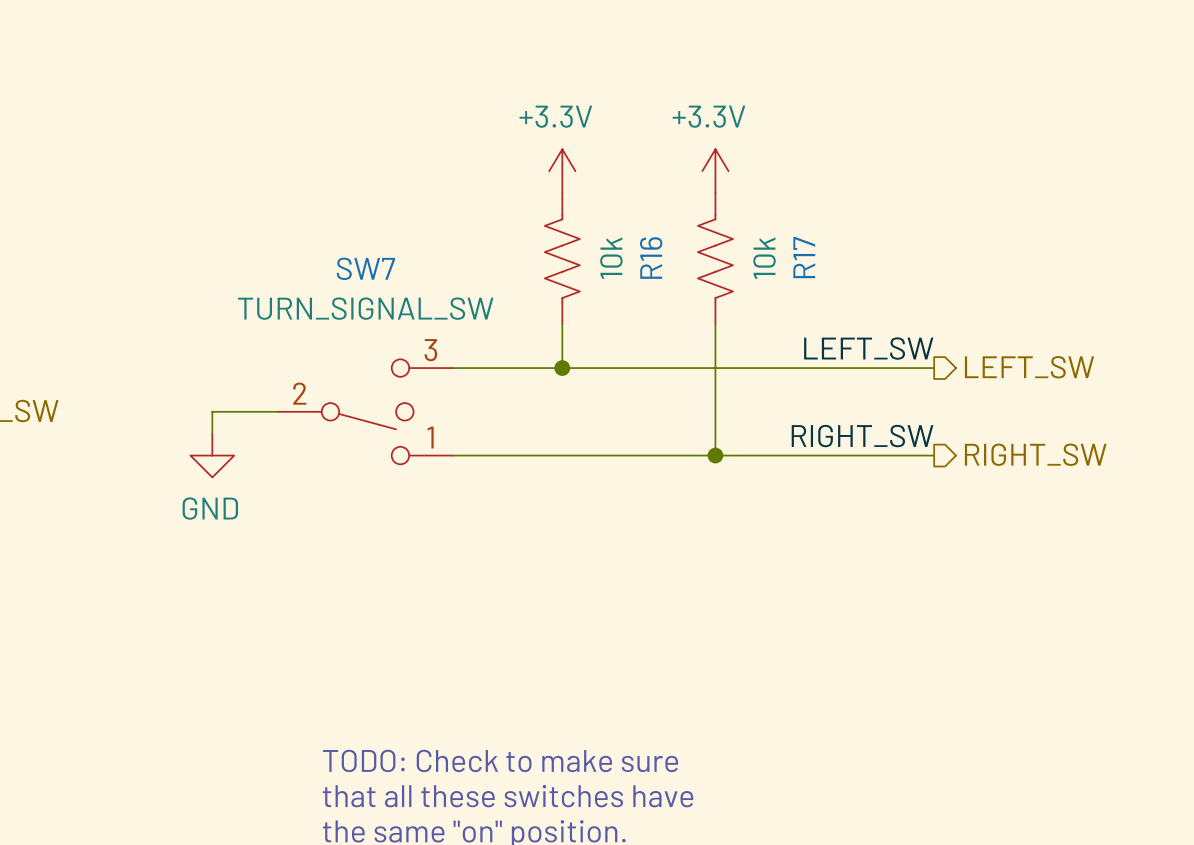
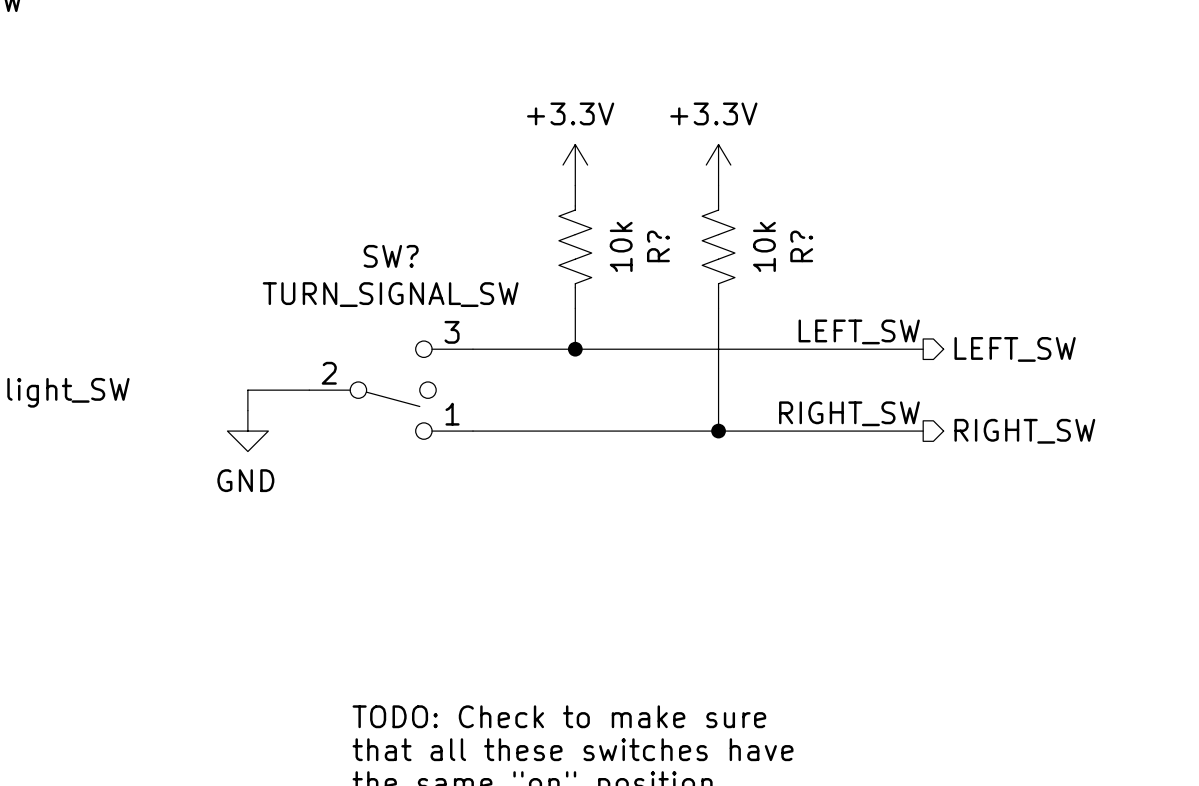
R17 name: R17 (804, 257) -> R? (801, 246)
R16 name: R16 (651, 258) -> R? (658, 246)
SW7 name: SW7 (365, 268) -> SW? (391, 256)

